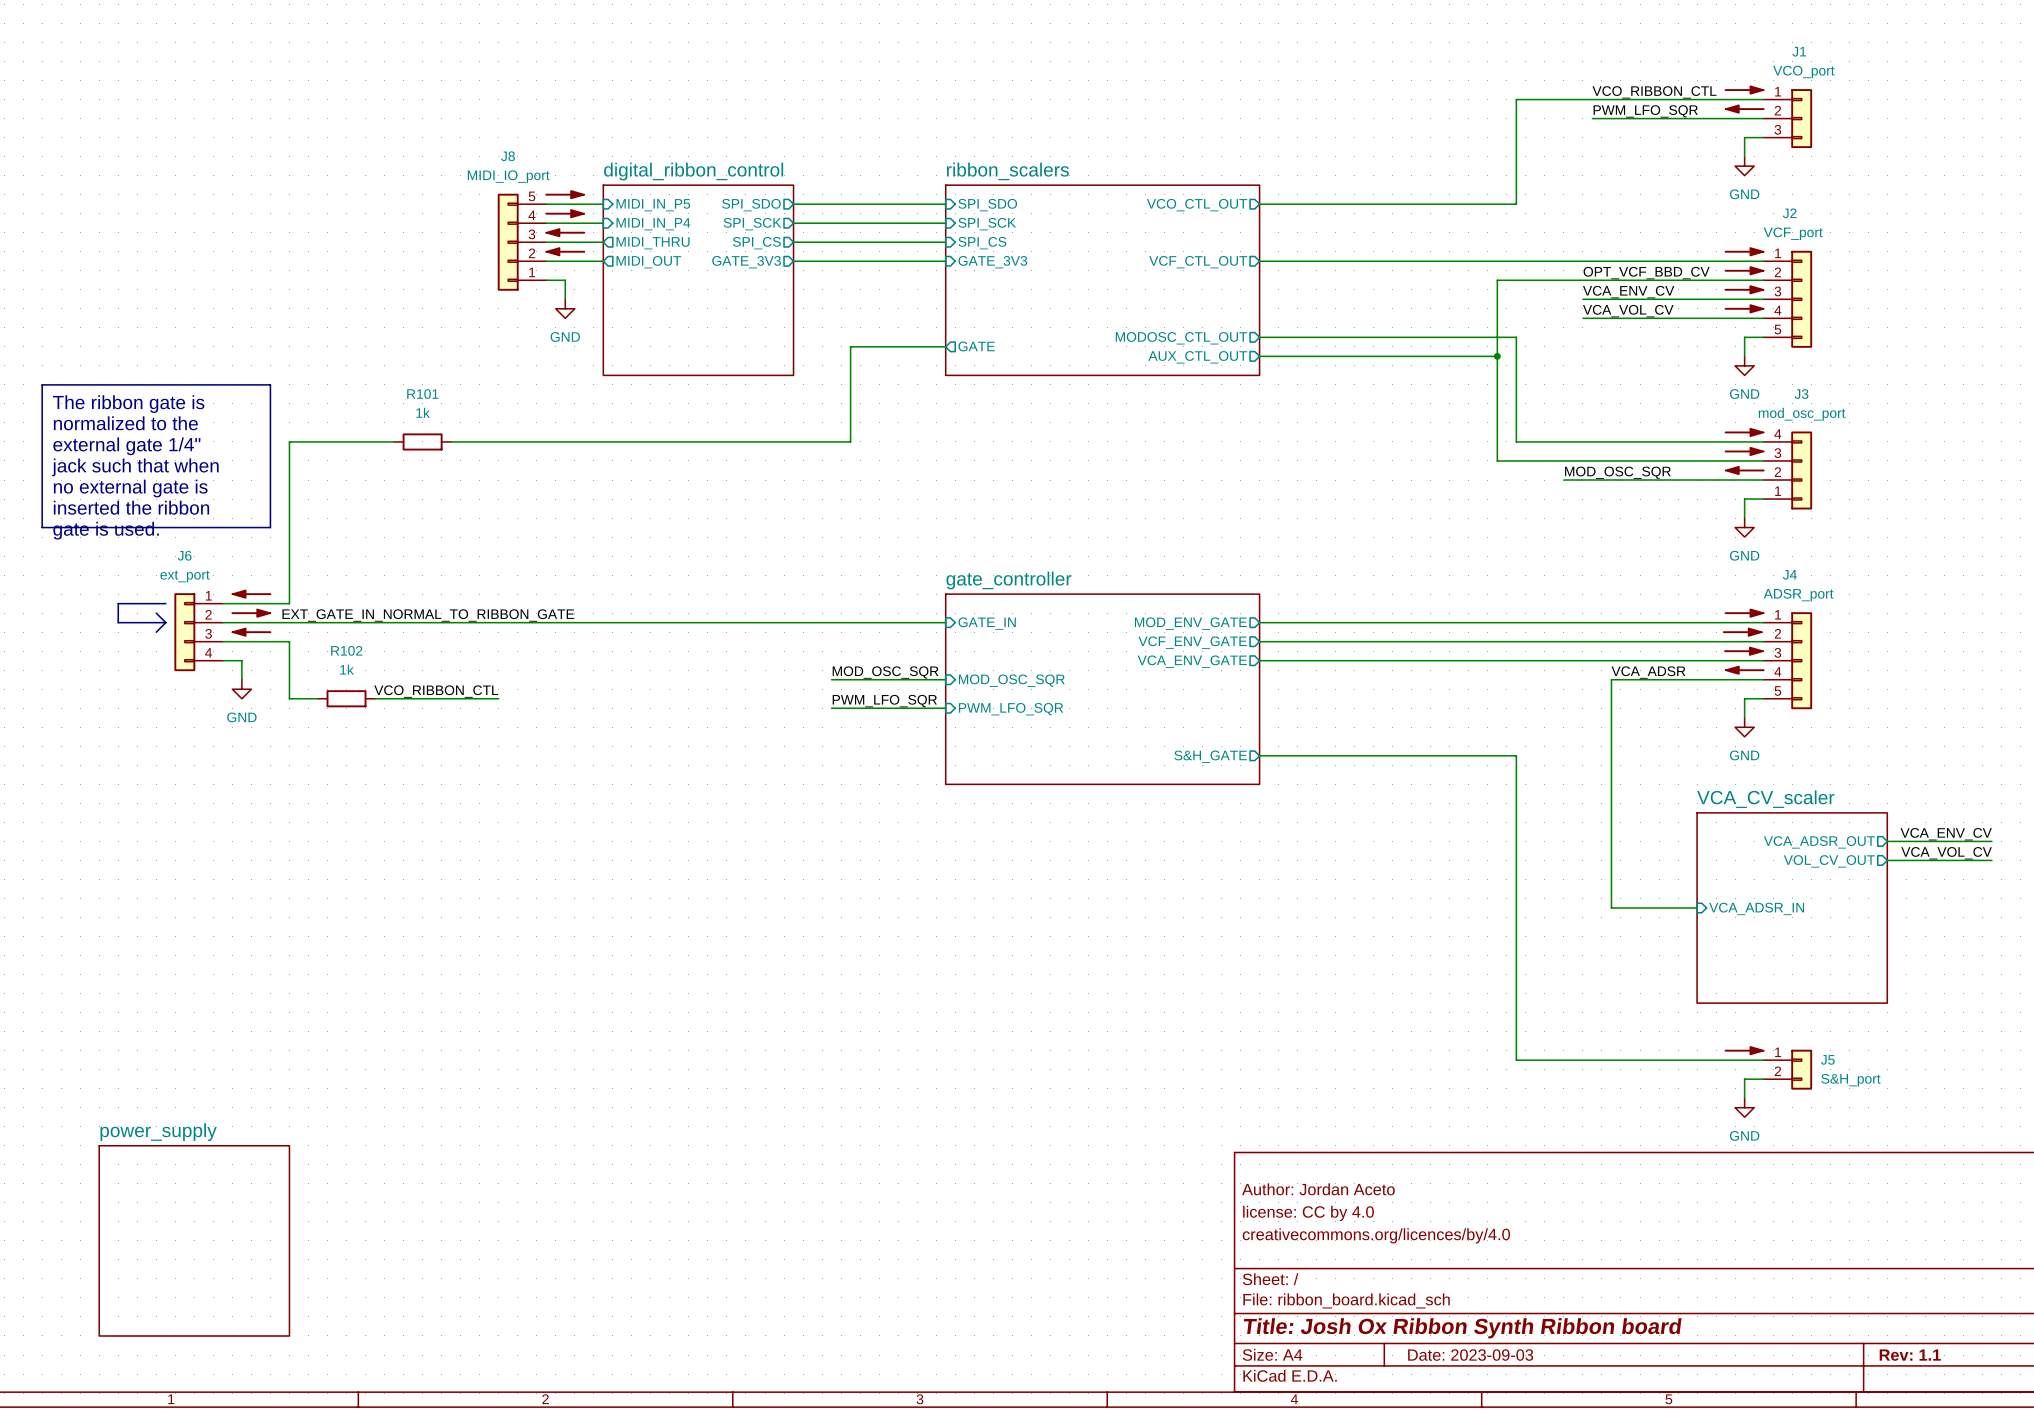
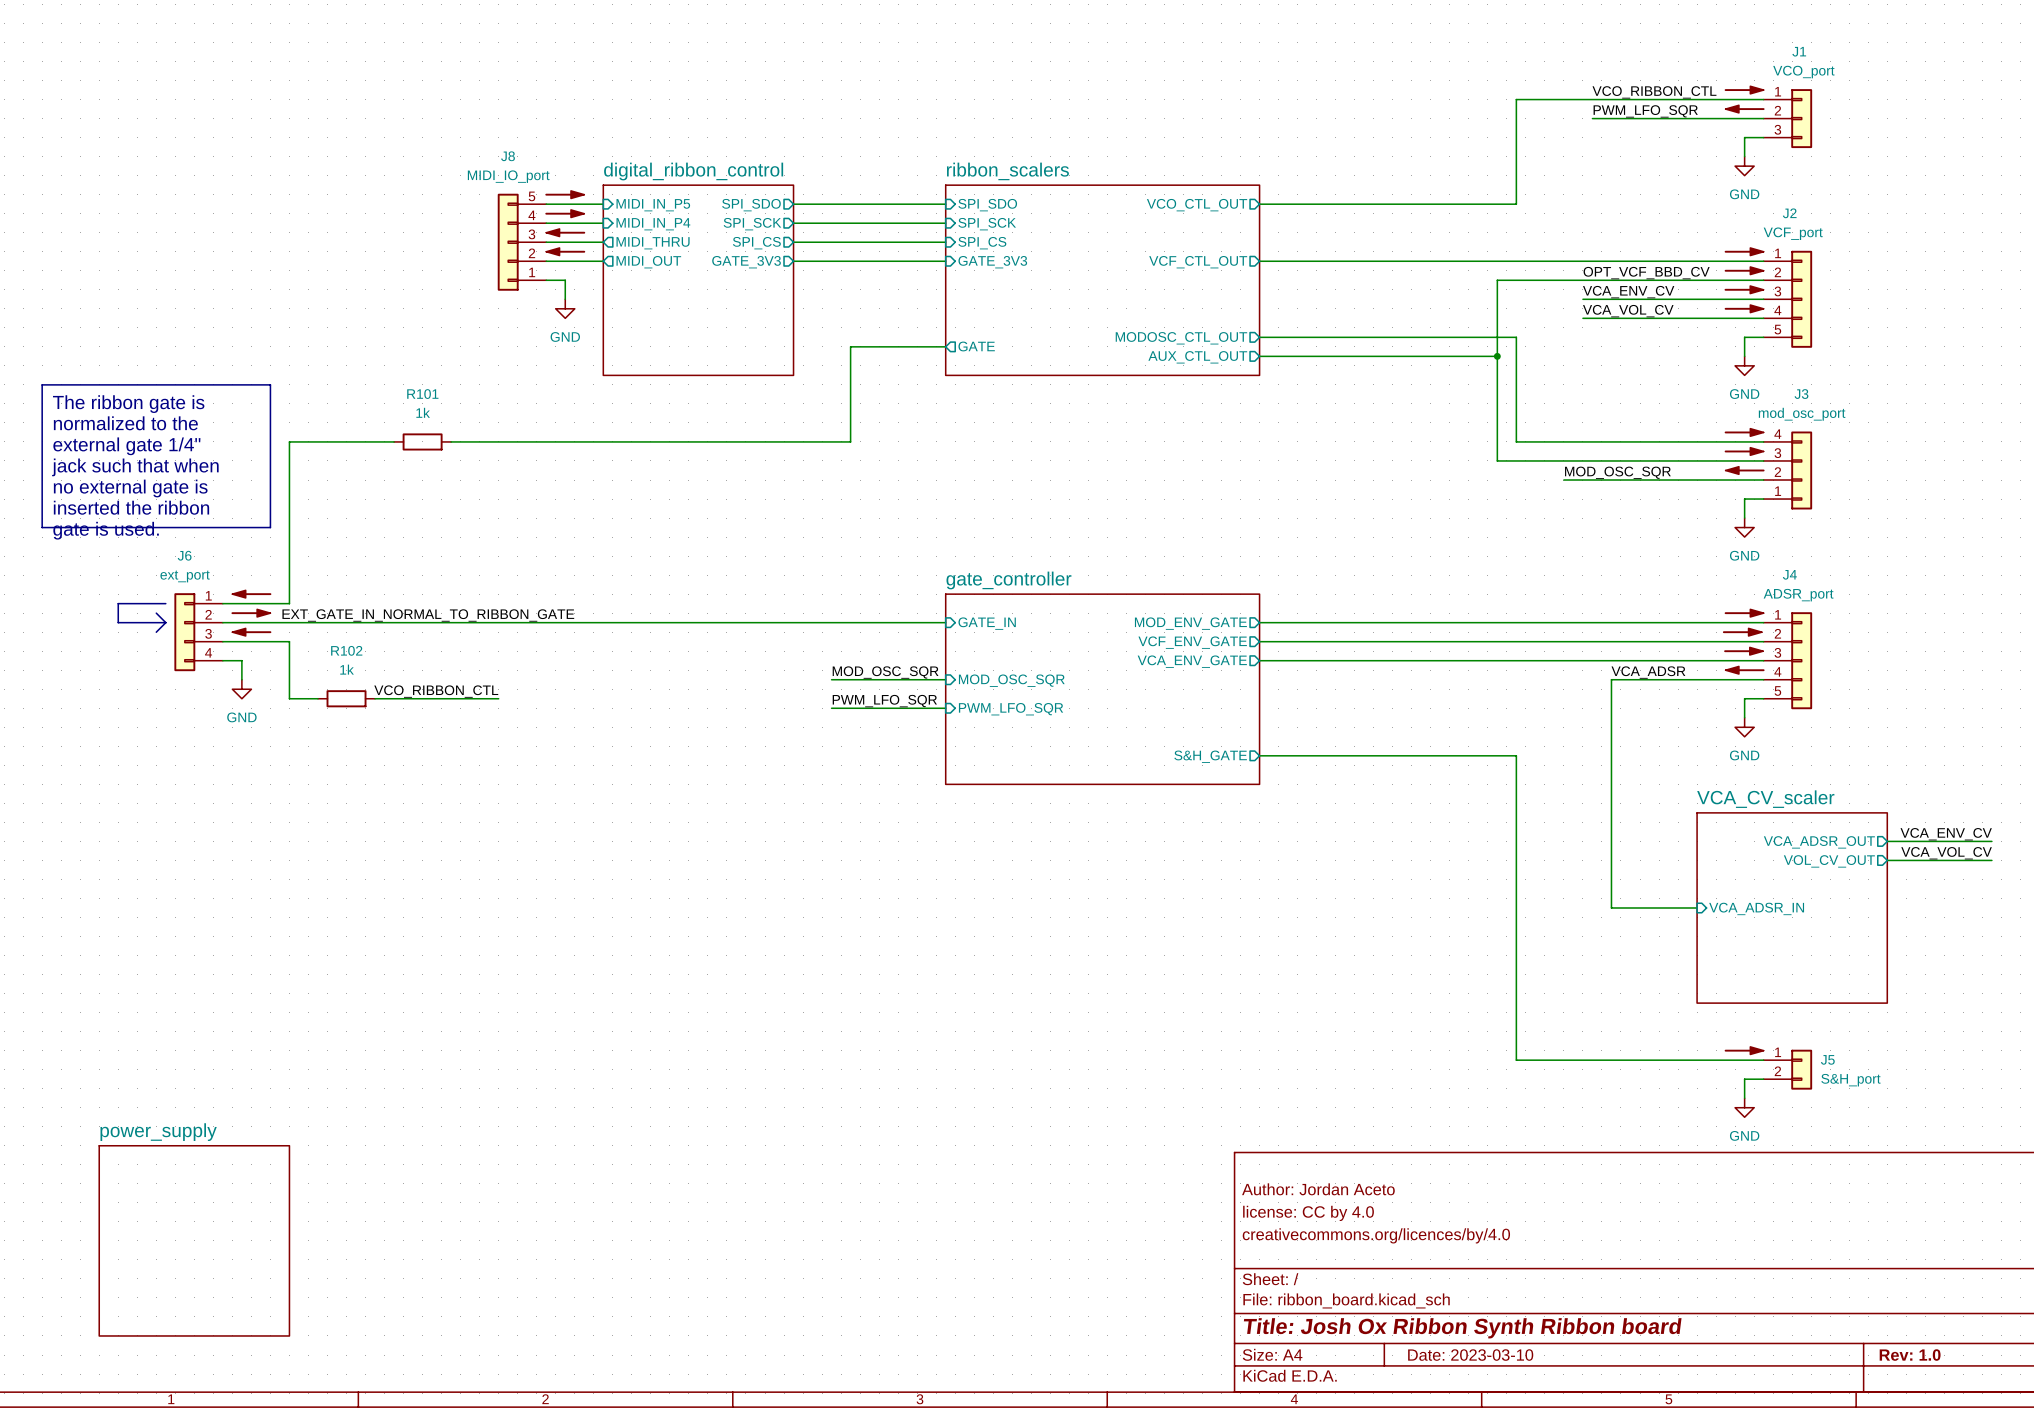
title block: Date: 2023-09-03 (1470, 1355) -> Date: 2023-03-10 (1470, 1355)
title block: Rev: 1.1 (1910, 1355) -> Rev: 1.0 (1910, 1355)

